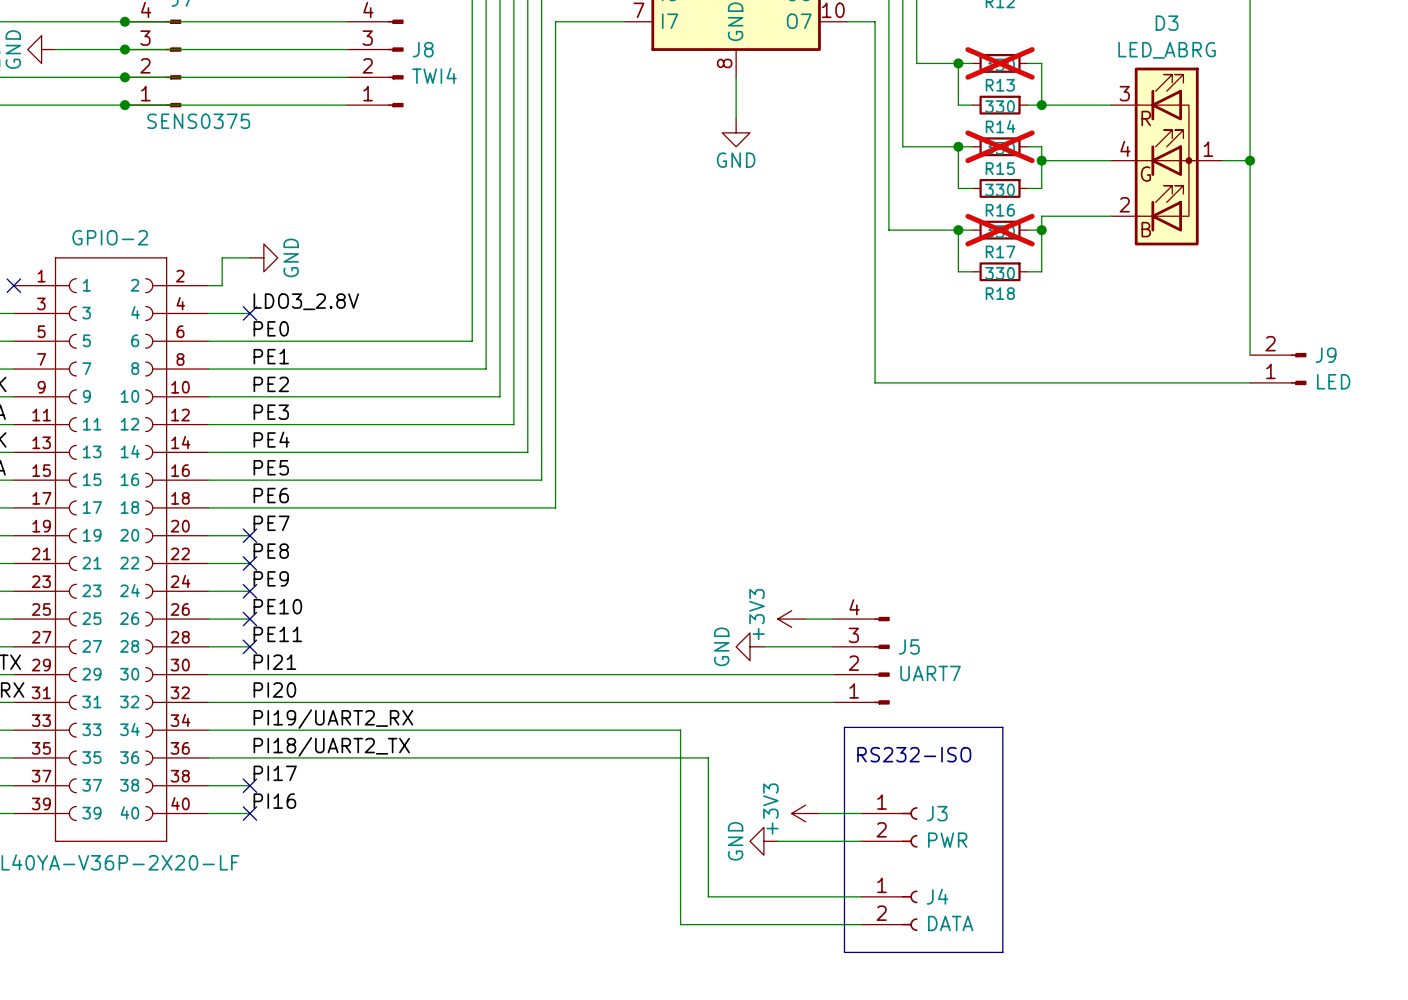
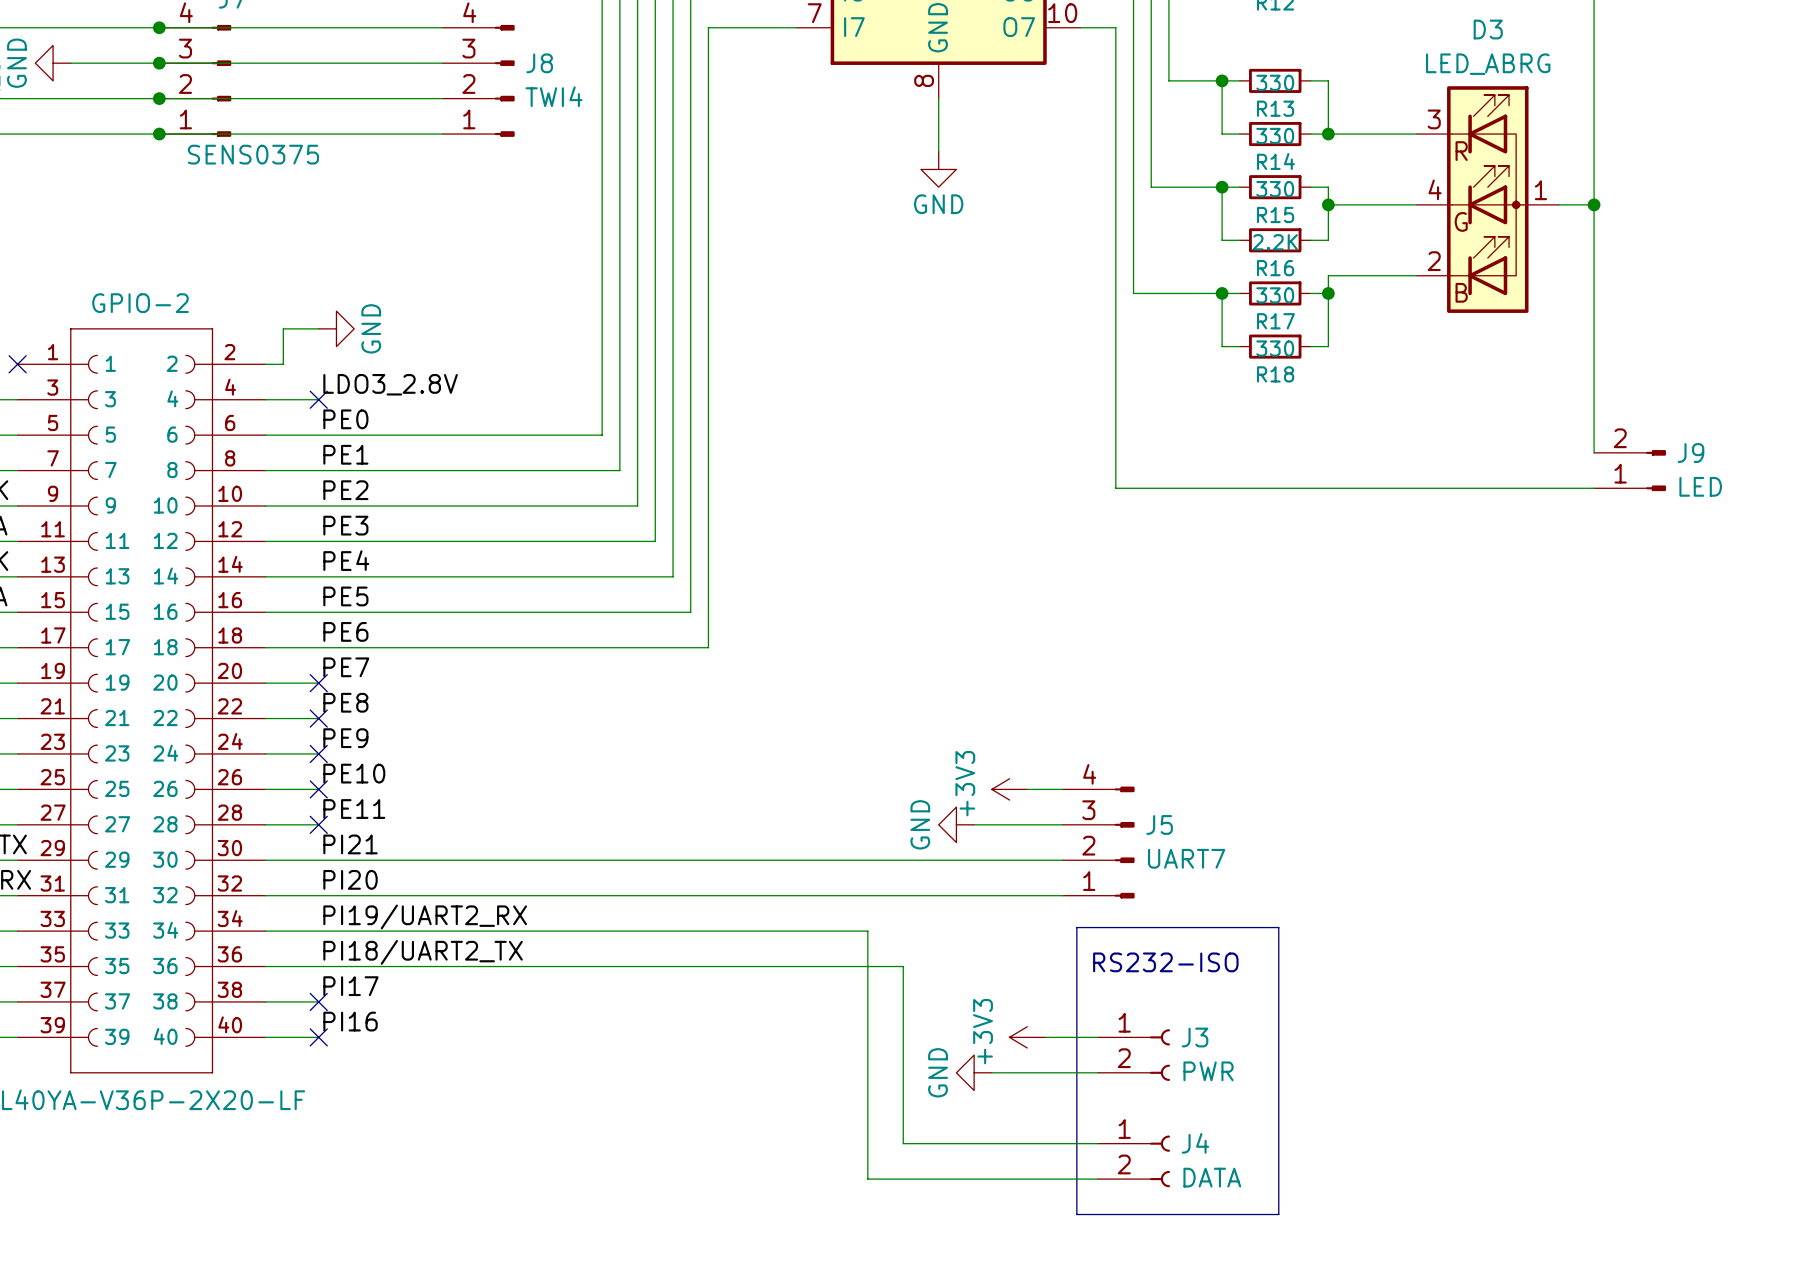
R13 do-not-place cross: (1000, 63) -> none
R15 do-not-place cross: (1000, 146) -> none
R16 value: 330 (1000, 189) -> 2.2K (1275, 242)
R17 do-not-place cross: (1000, 230) -> none

